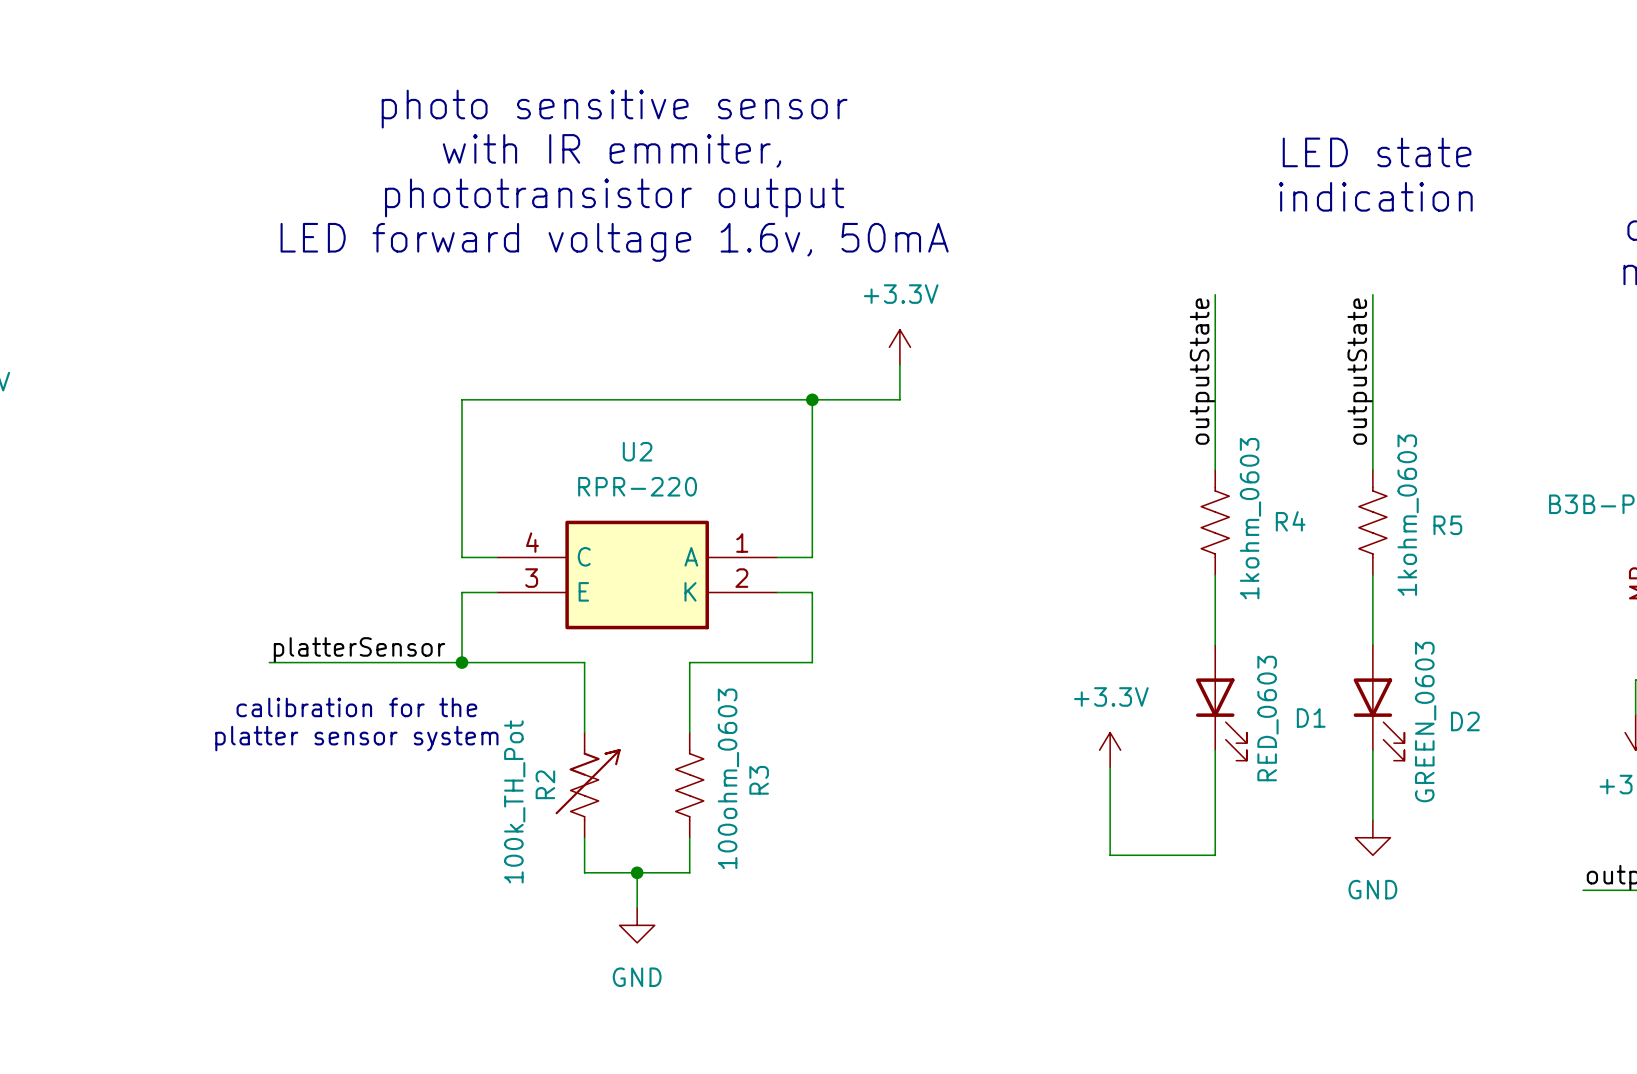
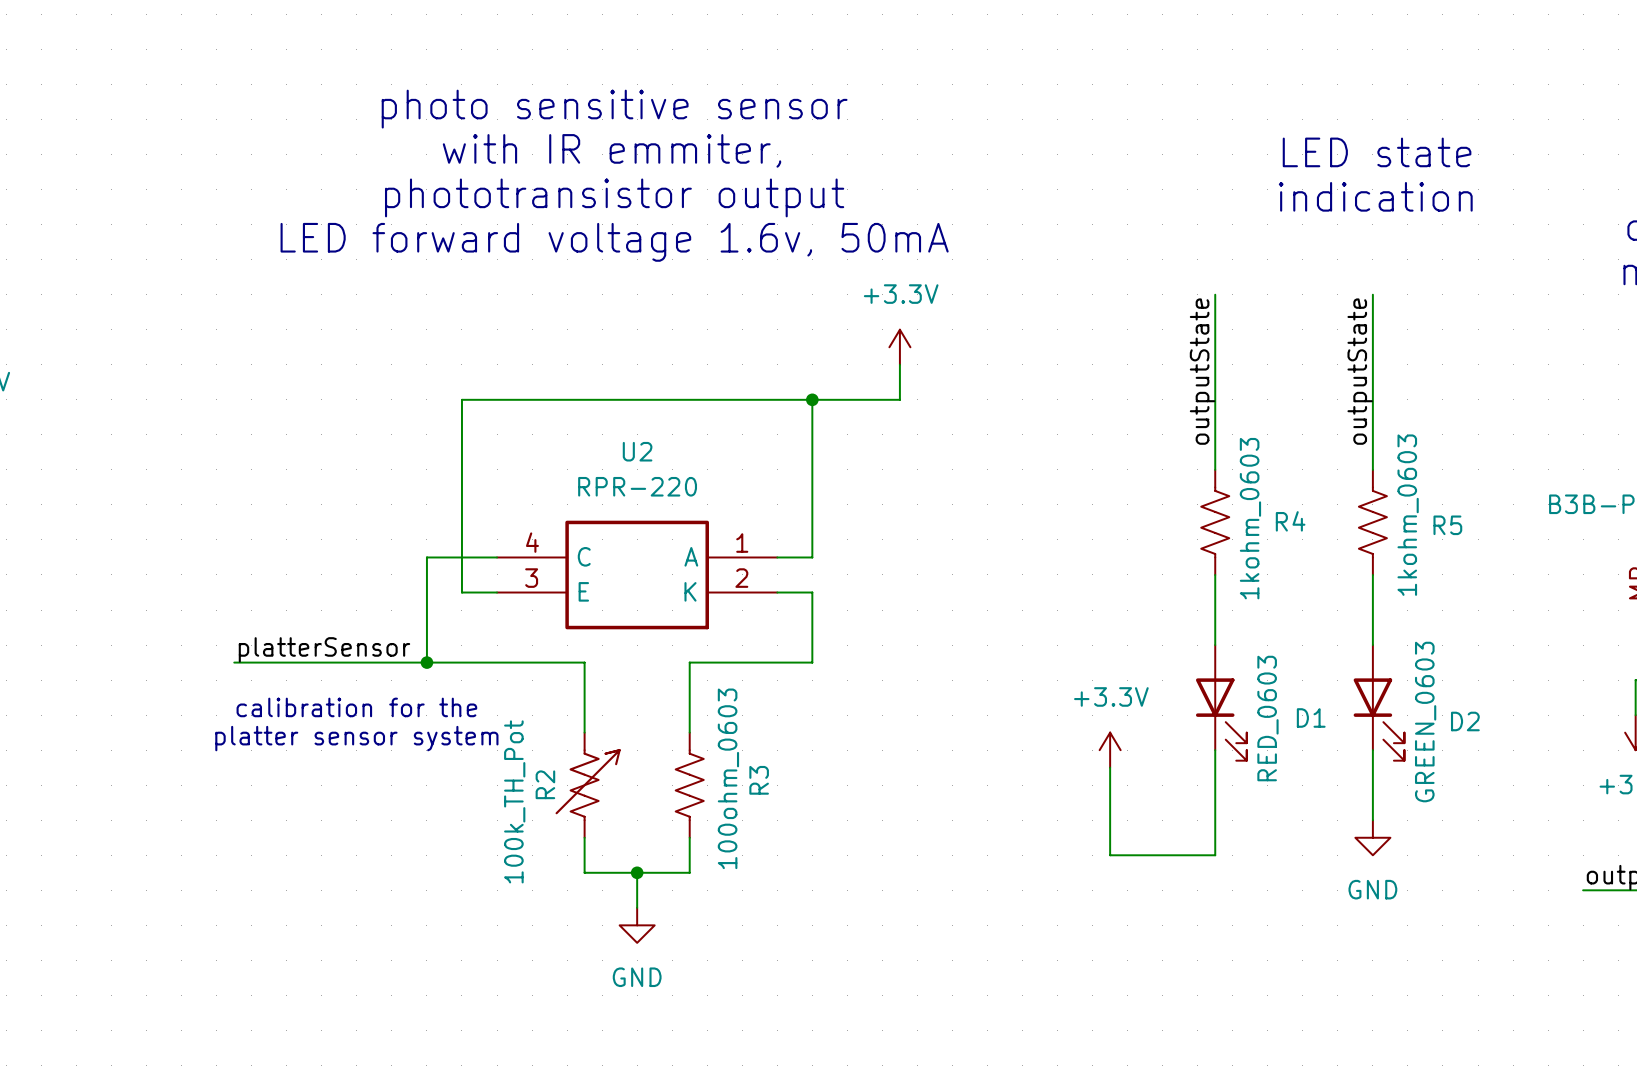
U2 symbol: [497, 520, 778, 630] -> [497, 520, 778, 630]
wire: (461, 592) (461, 662) -> (461, 592) (461, 557) (426, 557) (426, 662)
label position: platterSensor (359, 649) -> platterSensor (324, 649)
wire: none -> (234, 662) (269, 662)
junction position: (461, 662) -> (426, 662)

